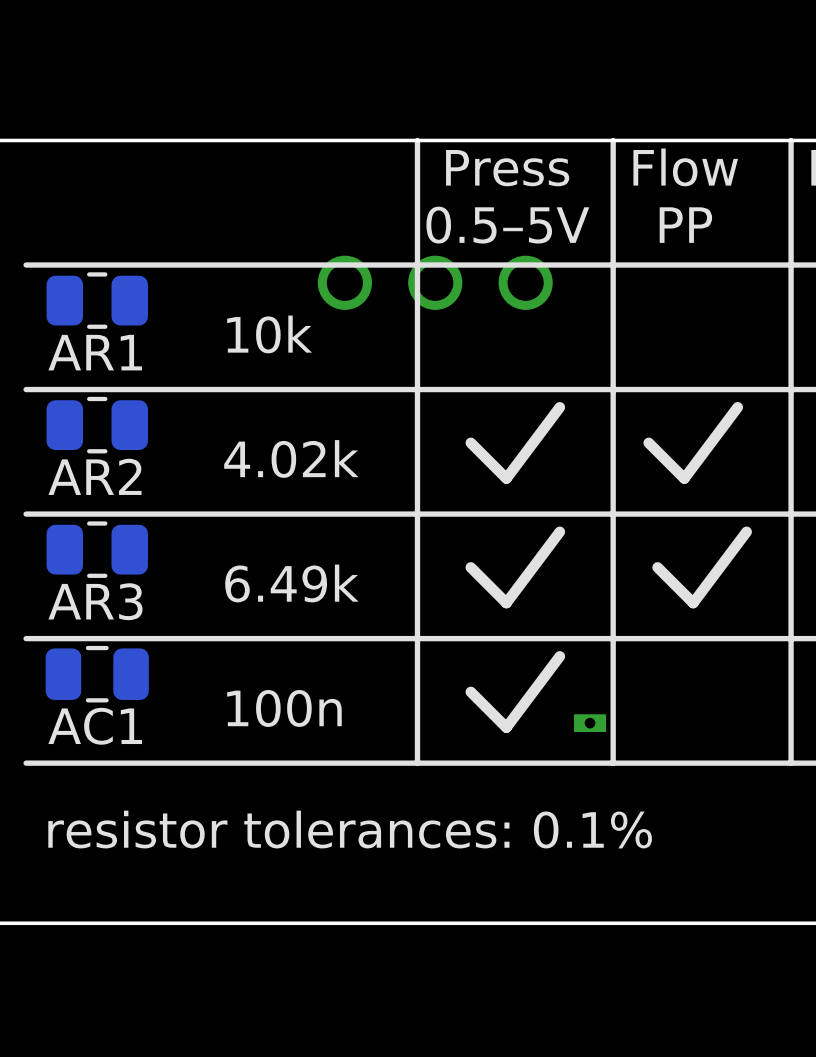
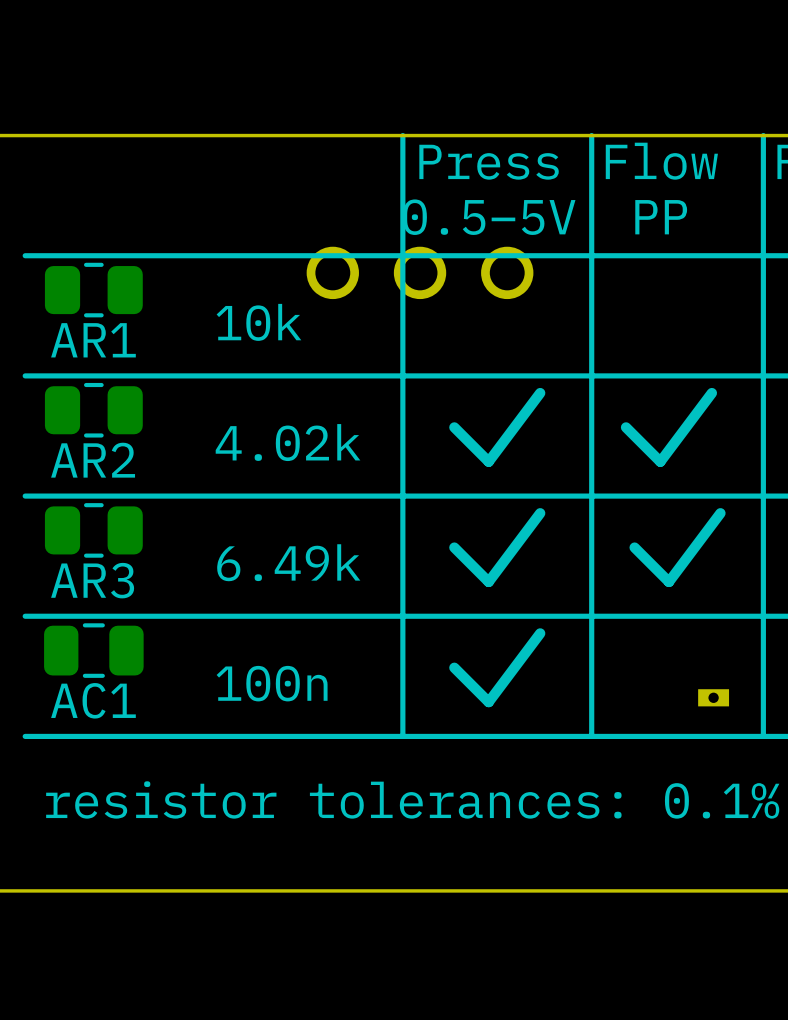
part position: (590, 723) -> (713, 697)

